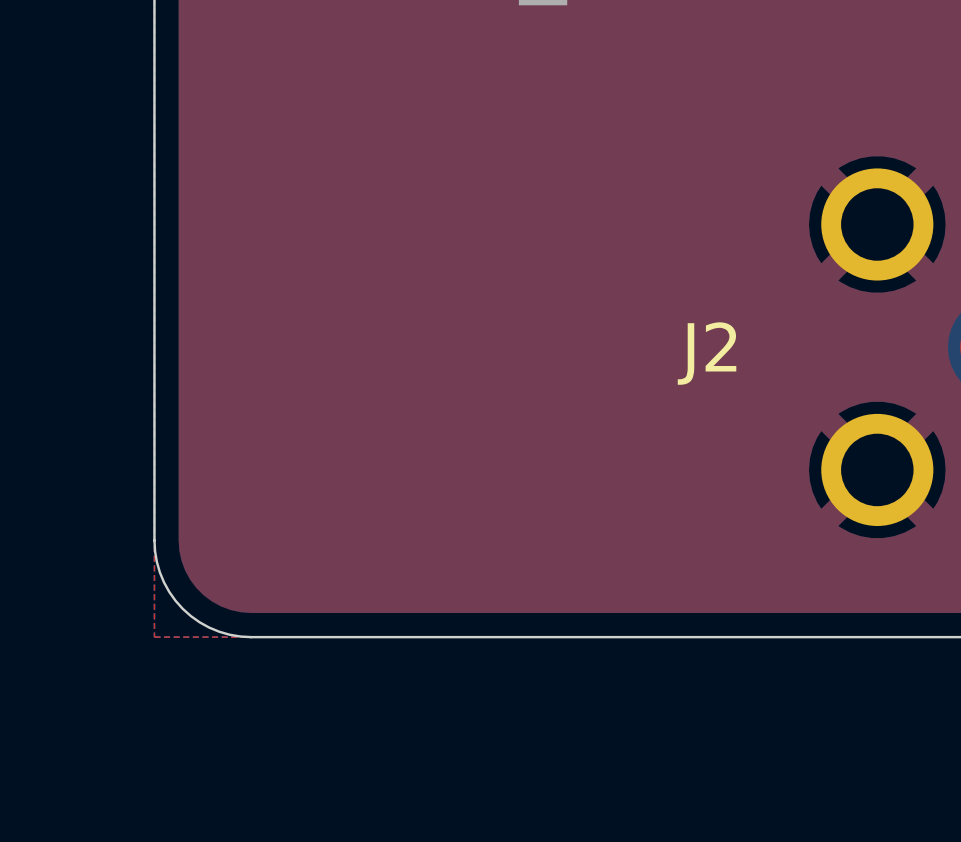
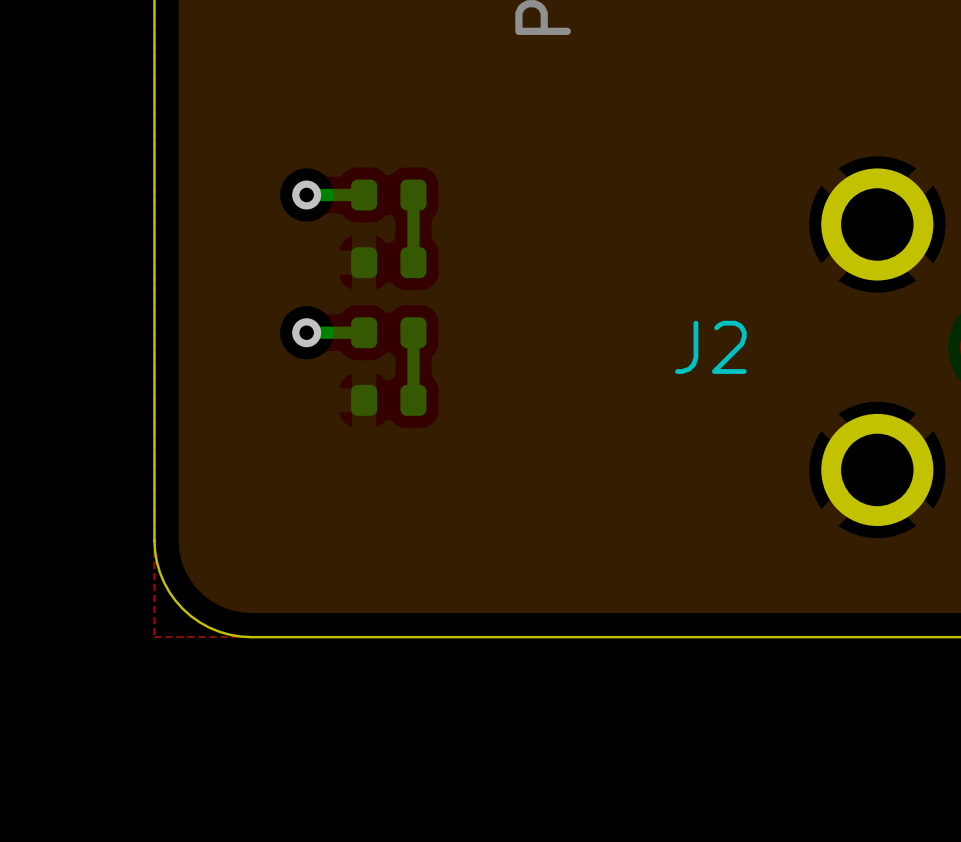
bottom track: none -> (306, 195) (364, 195)
via: none -> (306, 195)
part: none -> (388, 195)
bottom track: none -> (413, 195) (413, 262)
part: none -> (388, 262)
bottom track: none -> (306, 332) (364, 332)
via: none -> (306, 332)
part: none -> (388, 332)
bottom track: none -> (413, 332) (413, 400)
part: none -> (388, 400)

